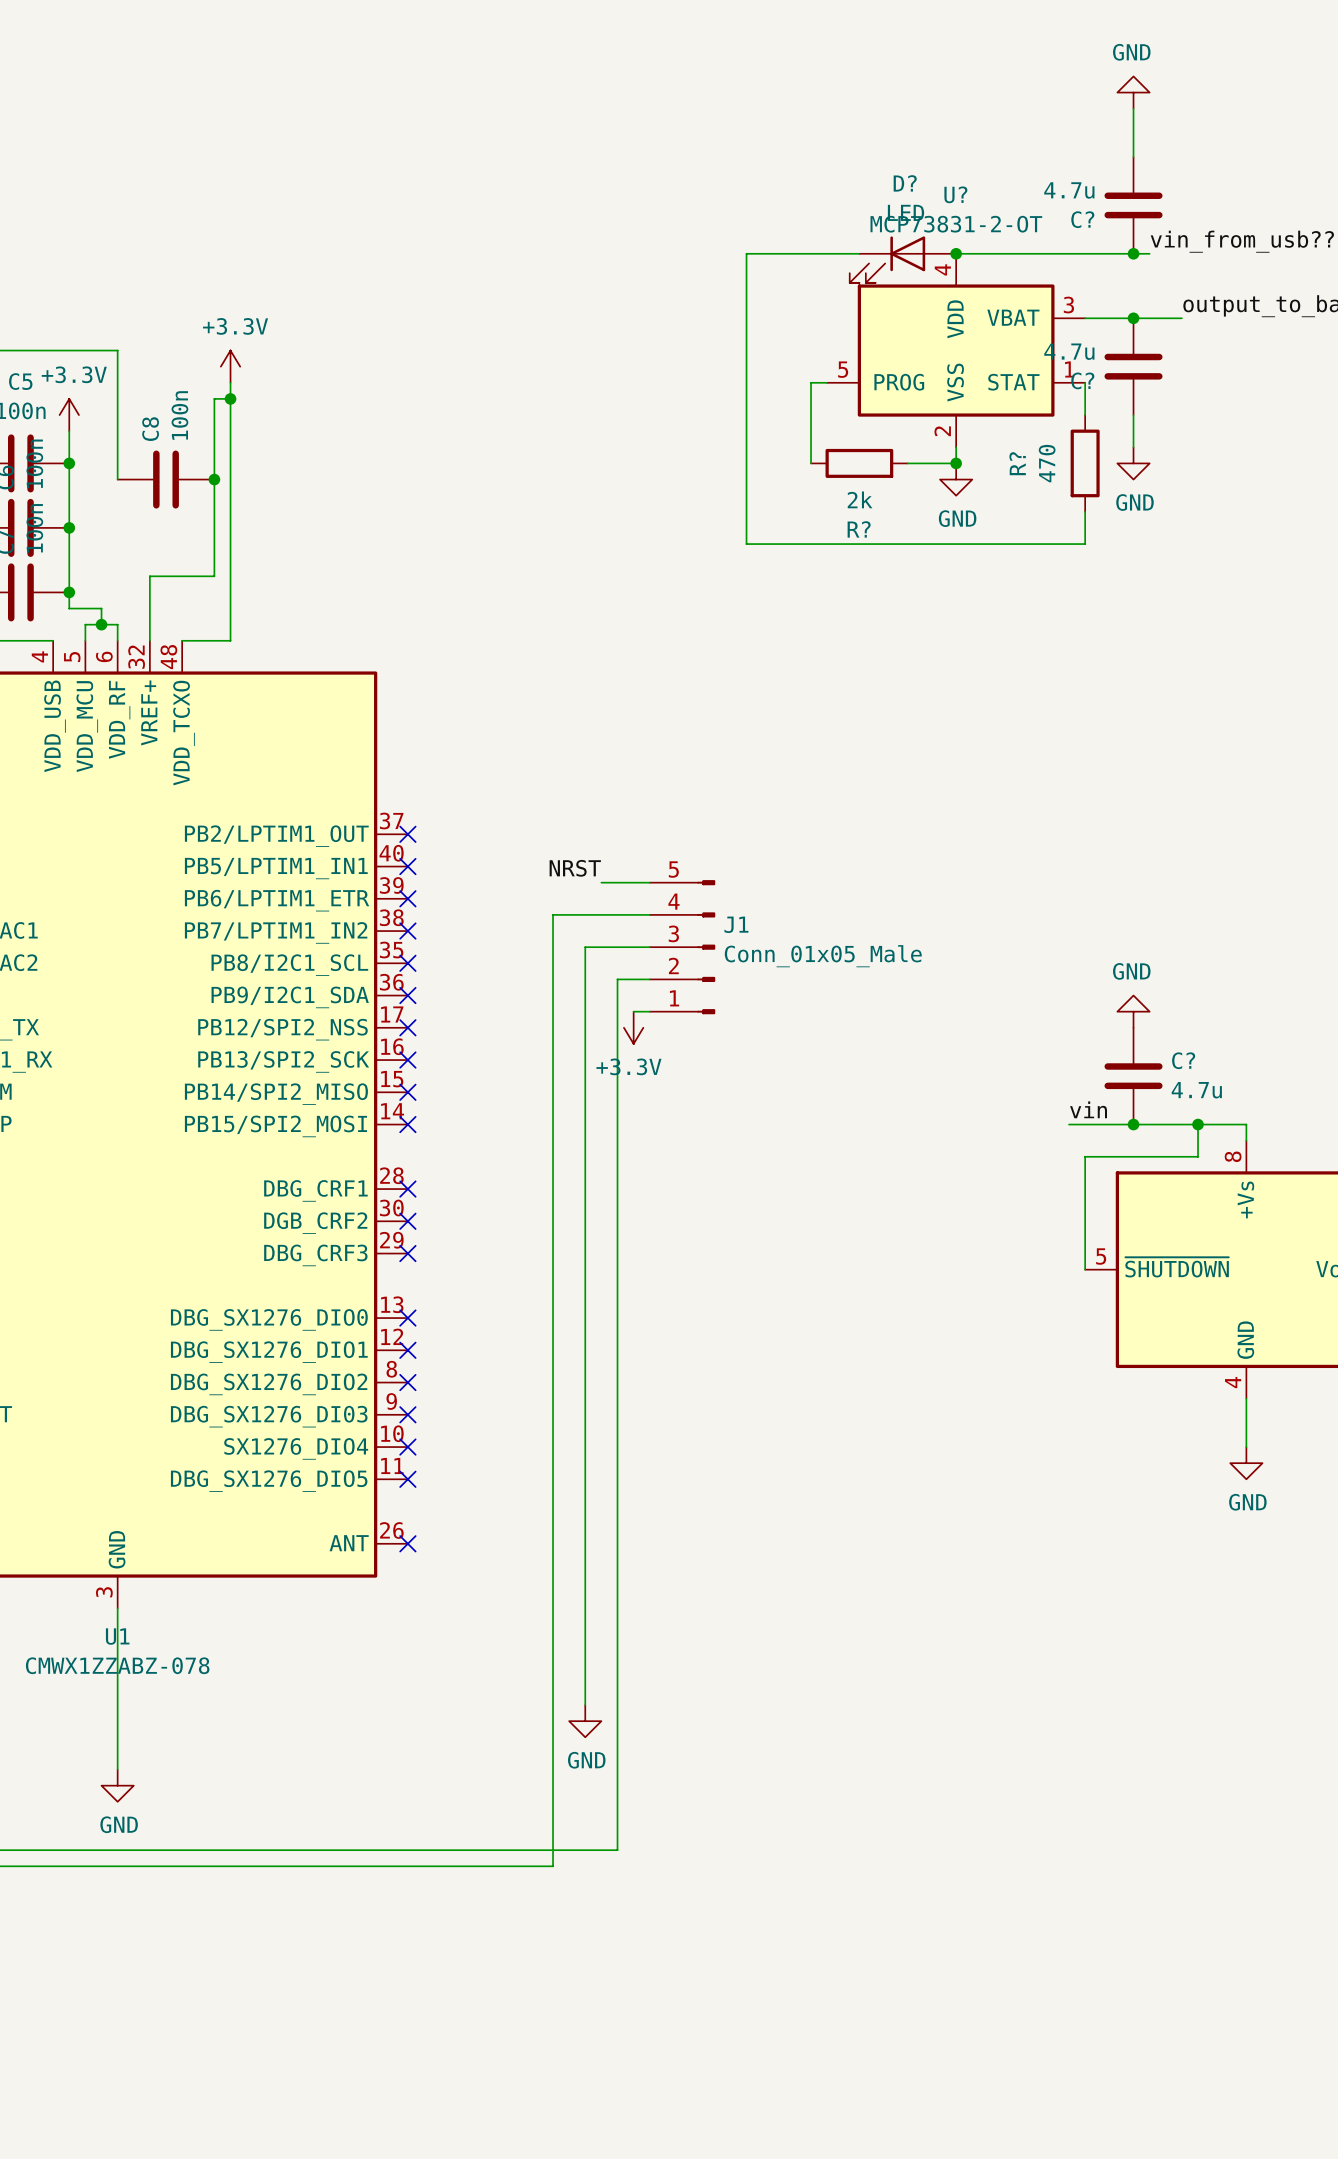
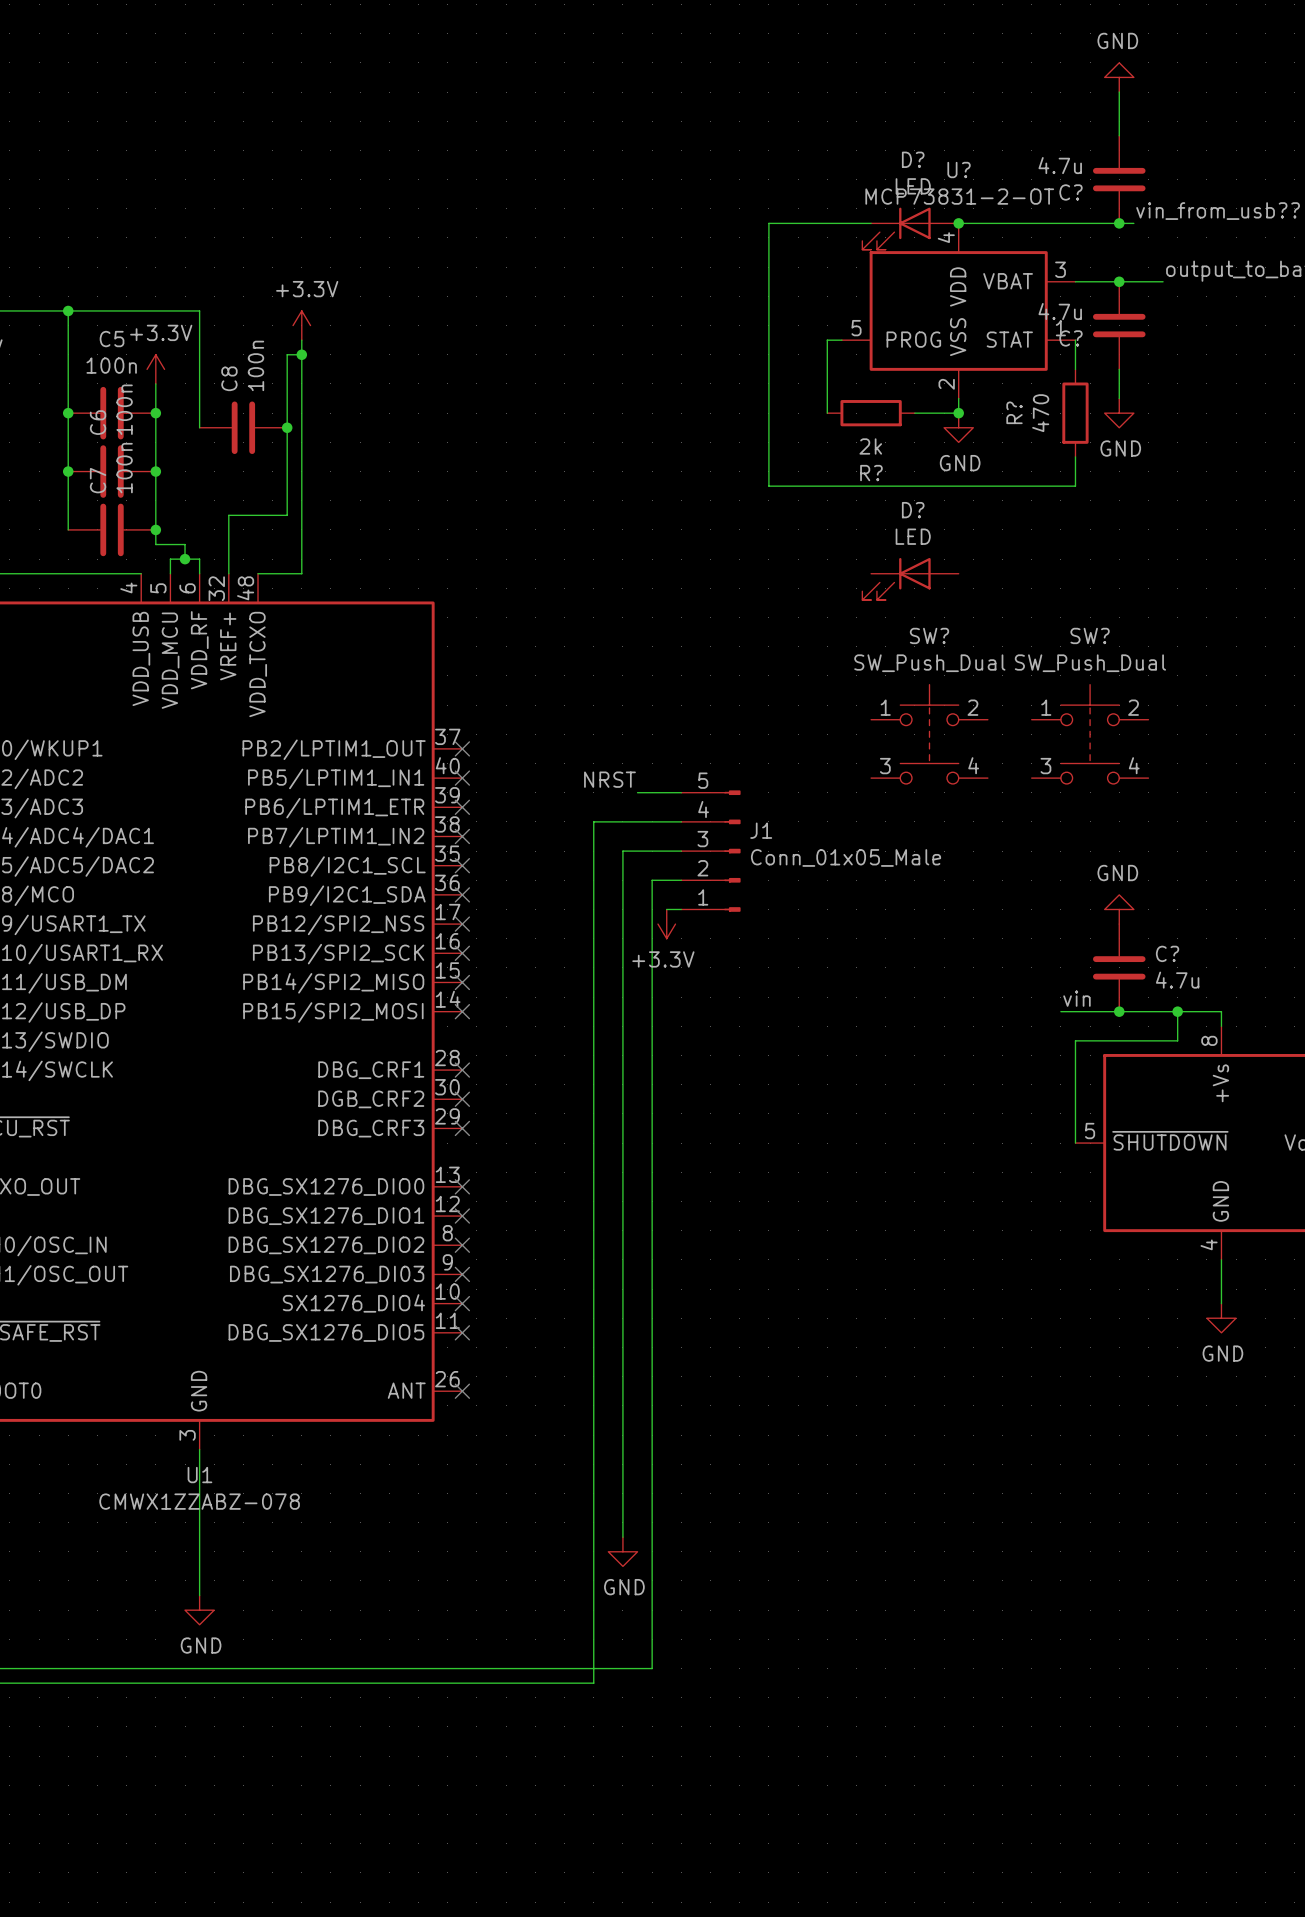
D?: none -> LED (910, 578)
SW?: none -> SW_Push_Dual (929, 734)
SW?: none -> SW_Push_Dual (1090, 734)

